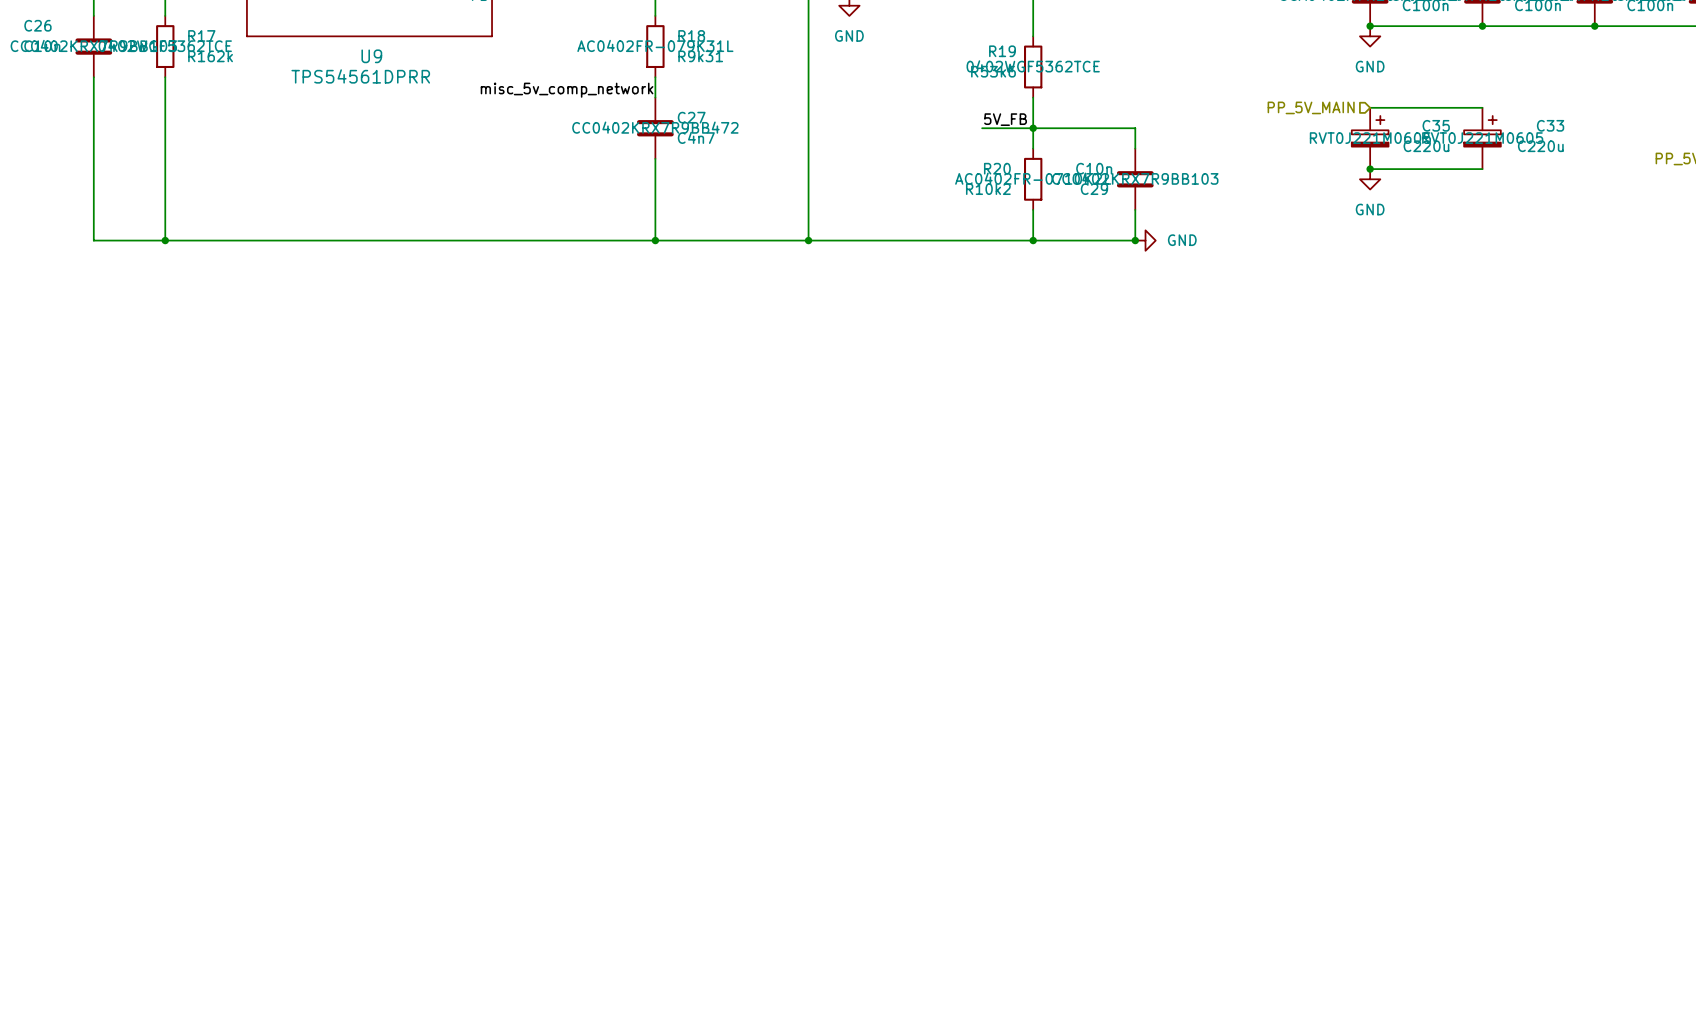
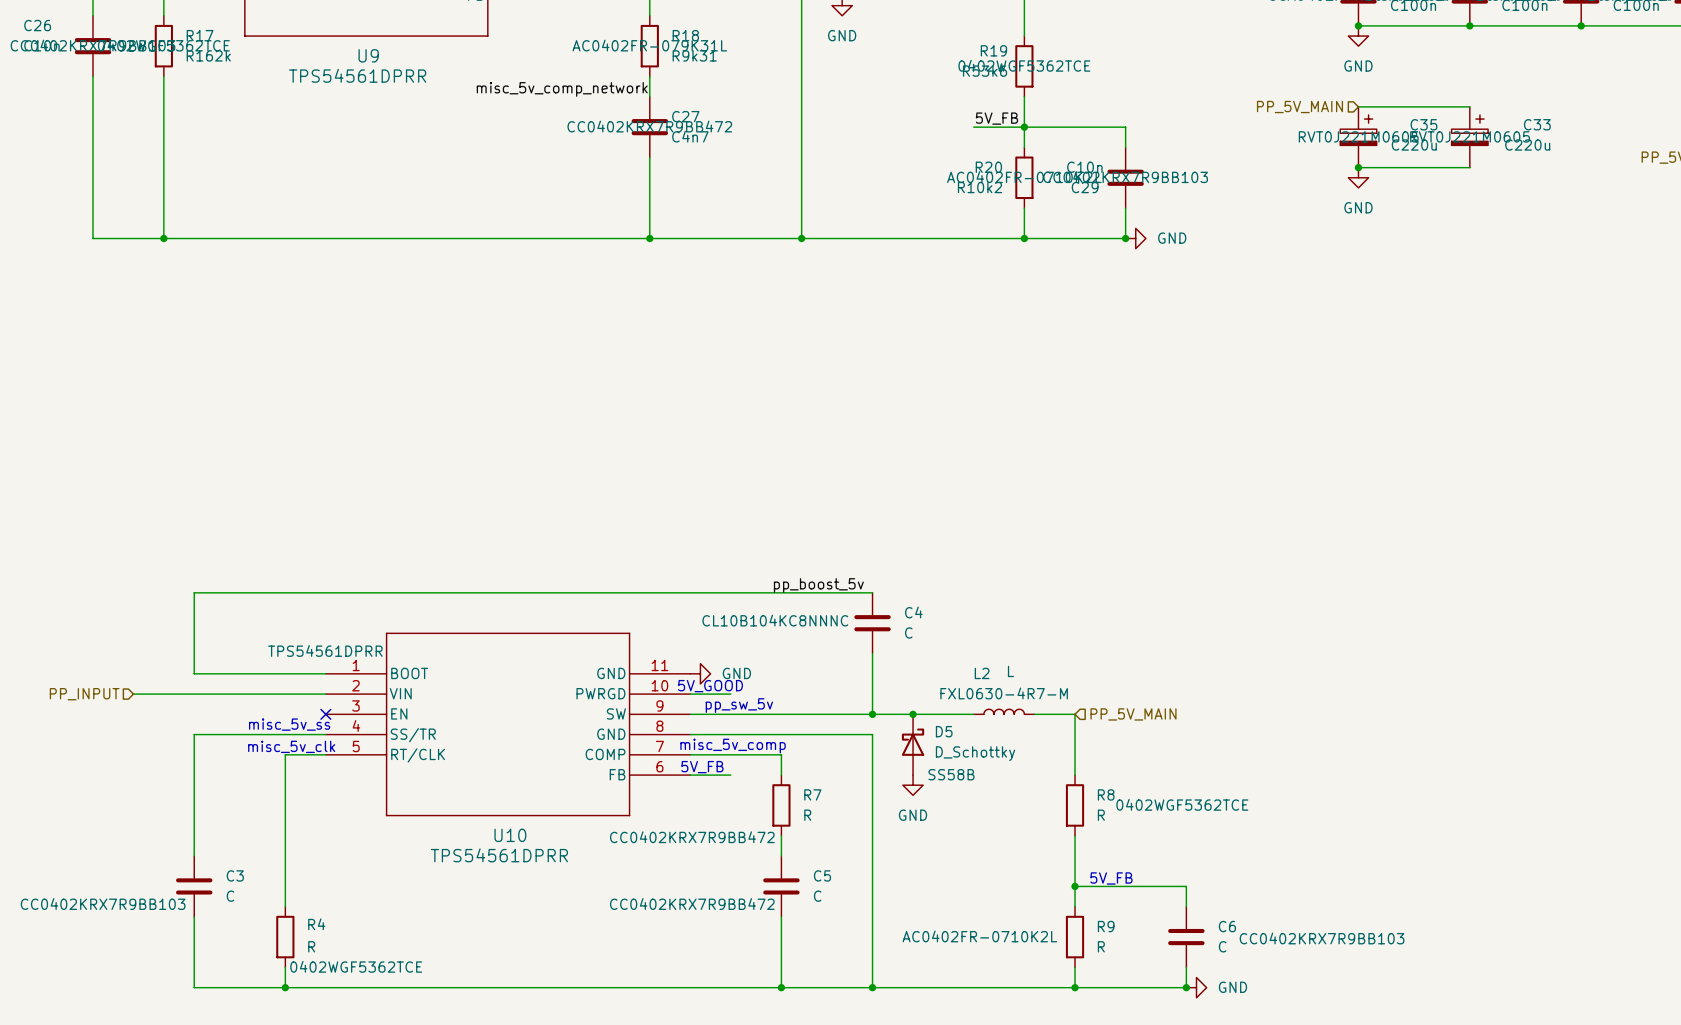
label: none -> pp_boost_5v (818, 585)
wire: none -> (872, 592) (194, 592) (194, 673) (325, 673)
C4: none -> C (872, 623)
wire: none -> (872, 653) (872, 714)
power symbol: none -> GND (700, 673)
text: none -> 5V_GOOD (710, 686)
hierarchical label: none -> PP_INPUT (84, 694)
wire: none -> (133, 694) (325, 694)
wire: none -> (690, 694) (730, 694)
text: none -> pp_sw_5v (739, 705)
L2: none -> L (1004, 711)
no-connect mark: none -> (325, 714)
wire: none -> (690, 714) (973, 714)
junction: none -> (872, 714)
junction: none -> (913, 714)
wire: none -> (1034, 714) (1075, 714) (1075, 775)
hierarchical label: none -> PP_5V_MAIN (1133, 714)
text: none -> misc_5v_ss (289, 724)
U10: none -> TPS54561DPRR (508, 724)
wire: none -> (325, 734) (194, 734) (194, 856)
wire: none -> (690, 734) (872, 734) (872, 987)
D5: none -> D_Schottky (913, 744)
text: none -> misc_5v_comp (733, 746)
text: none -> misc_5v_clk (291, 746)
wire: none -> (325, 754) (285, 754) (285, 906)
wire: none -> (690, 754) (781, 754) (781, 775)
text: none -> 5V_FB (702, 767)
wire: none -> (690, 775) (730, 775)
power symbol: none -> GND (913, 785)
R7: none -> R (781, 805)
R8: none -> R (1075, 805)
wire: none -> (781, 835) (781, 856)
wire: none -> (1075, 835) (1075, 906)
text: none -> 5V_FB (1111, 878)
C3: none -> C (194, 886)
C5: none -> C (781, 886)
wire: none -> (1075, 886) (1186, 886) (1186, 906)
junction: none -> (1075, 886)
wire: none -> (194, 916) (194, 987) (1186, 987) (1186, 967)
wire: none -> (781, 916) (781, 987)
R4: none -> R (285, 937)
R9: none -> R (1075, 937)
C6: none -> C (1186, 937)
wire: none -> (285, 967) (285, 987)
wire: none -> (1075, 967) (1075, 987)
junction: none -> (285, 987)
junction: none -> (781, 987)
junction: none -> (872, 987)
junction: none -> (1075, 987)
junction: none -> (1186, 987)
power symbol: none -> GND (1196, 987)

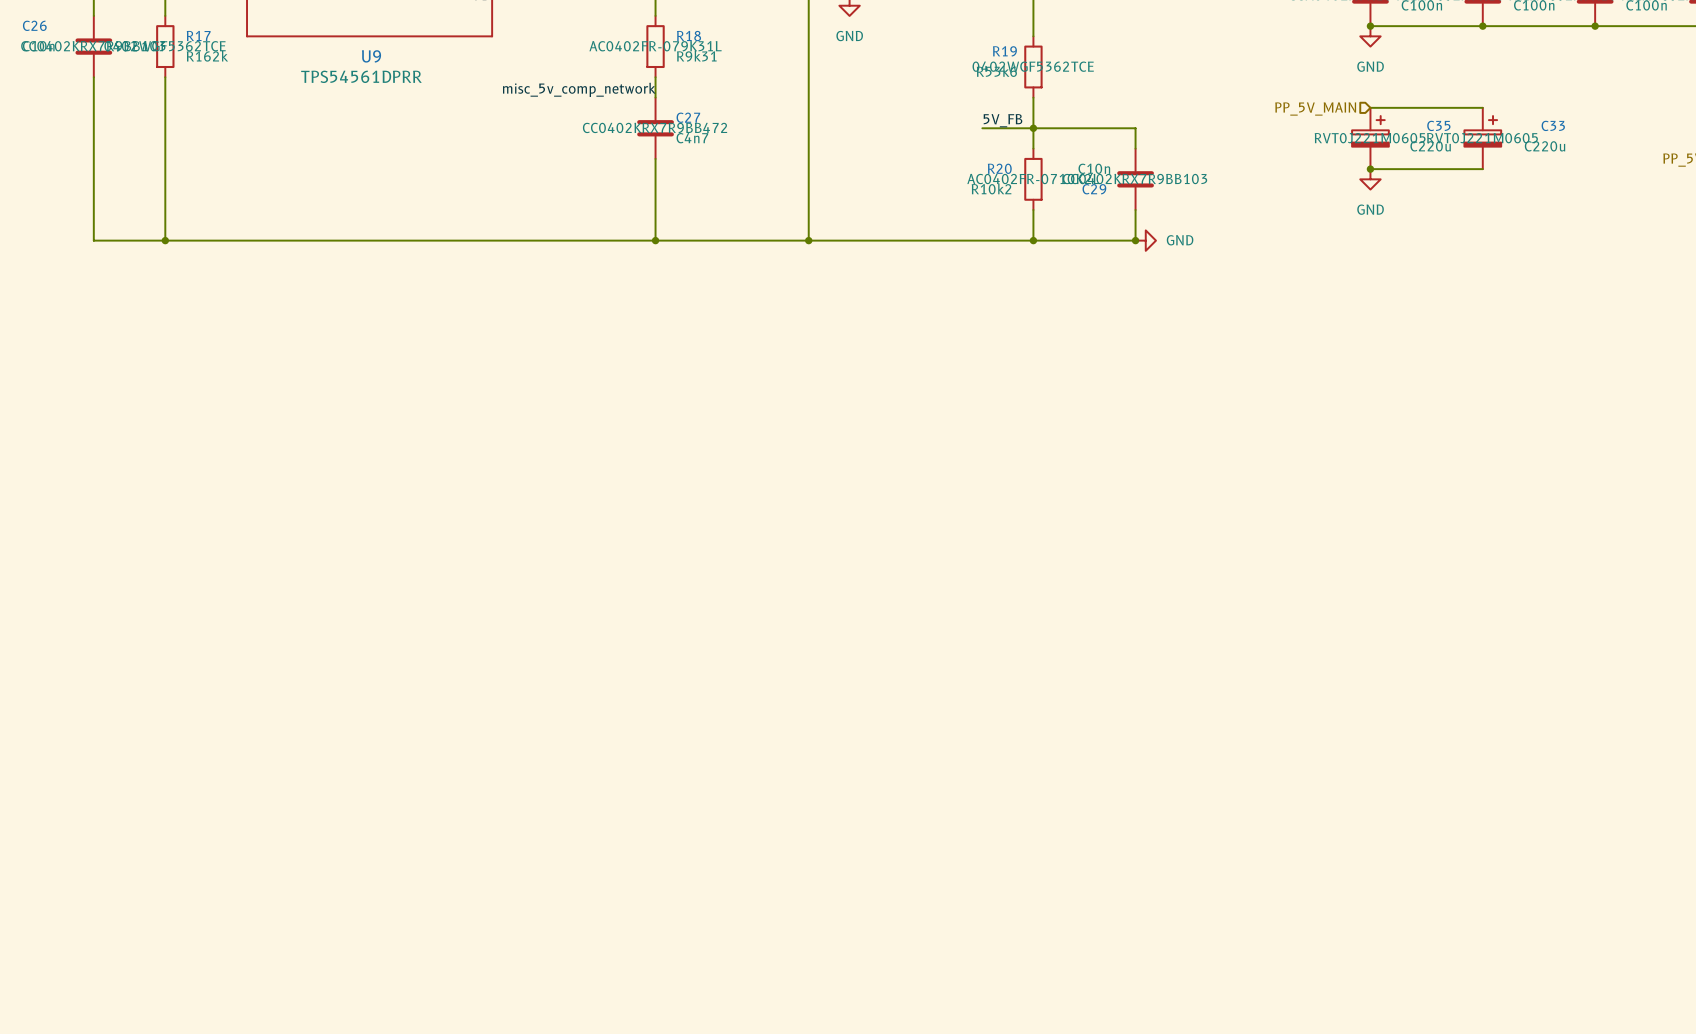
label: pp_boost_5v (818, 585) -> none
wire: (872, 592) (194, 592) (194, 673) (325, 673) -> none
C4: C (872, 623) -> none
wire: (872, 653) (872, 714) -> none
power symbol: GND (700, 673) -> none
text: 5V_GOOD (710, 686) -> none
hierarchical label: PP_INPUT (84, 694) -> none
wire: (133, 694) (325, 694) -> none
wire: (690, 694) (730, 694) -> none
text: pp_sw_5v (739, 705) -> none
L2: L (1004, 711) -> none
no-connect mark: (325, 714) -> none
wire: (690, 714) (973, 714) -> none
junction: (872, 714) -> none
junction: (913, 714) -> none
wire: (1034, 714) (1075, 714) (1075, 775) -> none
hierarchical label: PP_5V_MAIN (1133, 714) -> none
text: misc_5v_ss (289, 724) -> none
U10: TPS54561DPRR (508, 724) -> none
wire: (325, 734) (194, 734) (194, 856) -> none
wire: (690, 734) (872, 734) (872, 987) -> none
D5: D_Schottky (913, 744) -> none
text: misc_5v_clk (291, 746) -> none
text: misc_5v_comp (733, 746) -> none
wire: (325, 754) (285, 754) (285, 906) -> none
wire: (690, 754) (781, 754) (781, 775) -> none
text: 5V_FB (702, 767) -> none
wire: (690, 775) (730, 775) -> none
power symbol: GND (913, 785) -> none
R7: R (781, 805) -> none
R8: R (1075, 805) -> none
wire: (781, 835) (781, 856) -> none
wire: (1075, 835) (1075, 906) -> none
text: 5V_FB (1111, 878) -> none
C3: C (194, 886) -> none
C5: C (781, 886) -> none
wire: (1075, 886) (1186, 886) (1186, 906) -> none
junction: (1075, 886) -> none
wire: (194, 916) (194, 987) (1186, 987) (1186, 967) -> none
wire: (781, 916) (781, 987) -> none
R4: R (285, 937) -> none
R9: R (1075, 937) -> none
C6: C (1186, 937) -> none
wire: (285, 967) (285, 987) -> none
wire: (1075, 967) (1075, 987) -> none
junction: (285, 987) -> none
junction: (781, 987) -> none
junction: (872, 987) -> none
junction: (1075, 987) -> none
junction: (1186, 987) -> none
power symbol: GND (1196, 987) -> none

